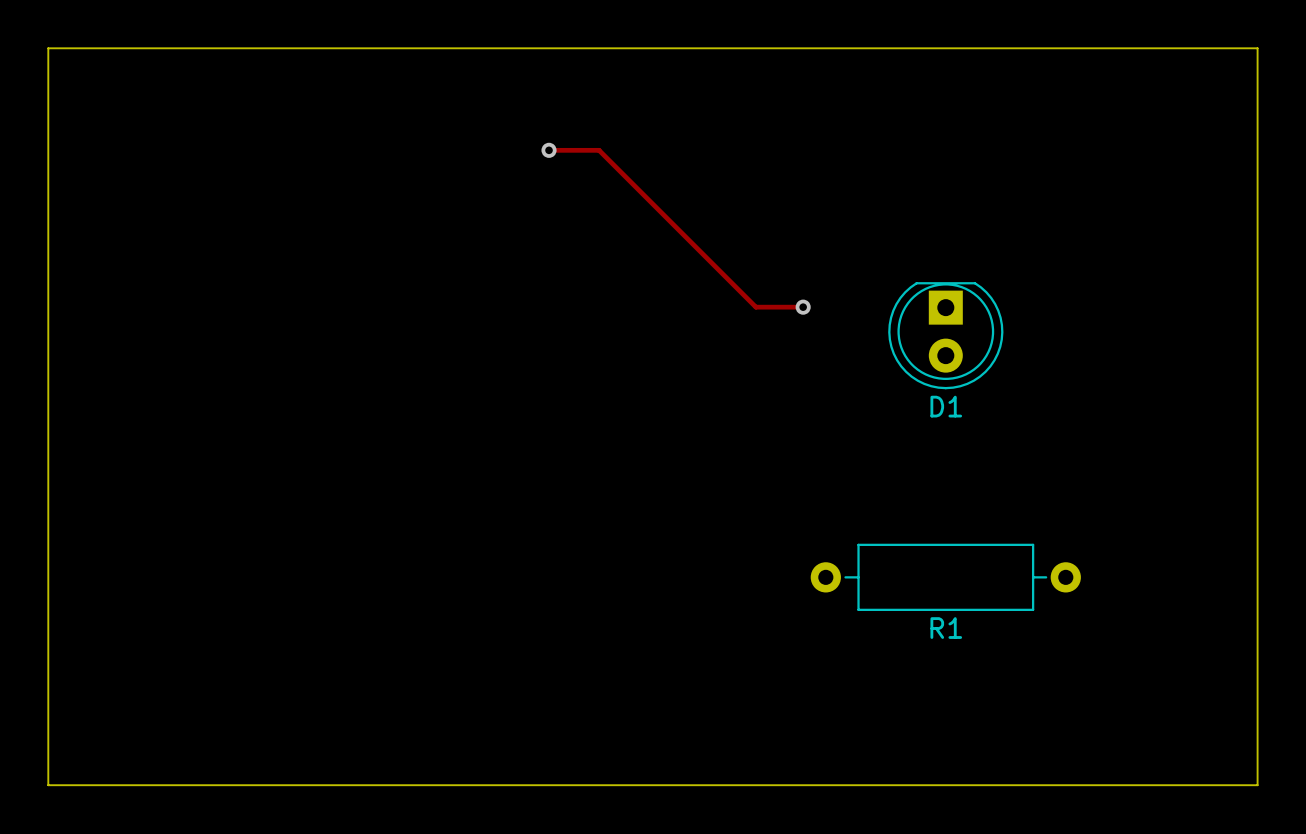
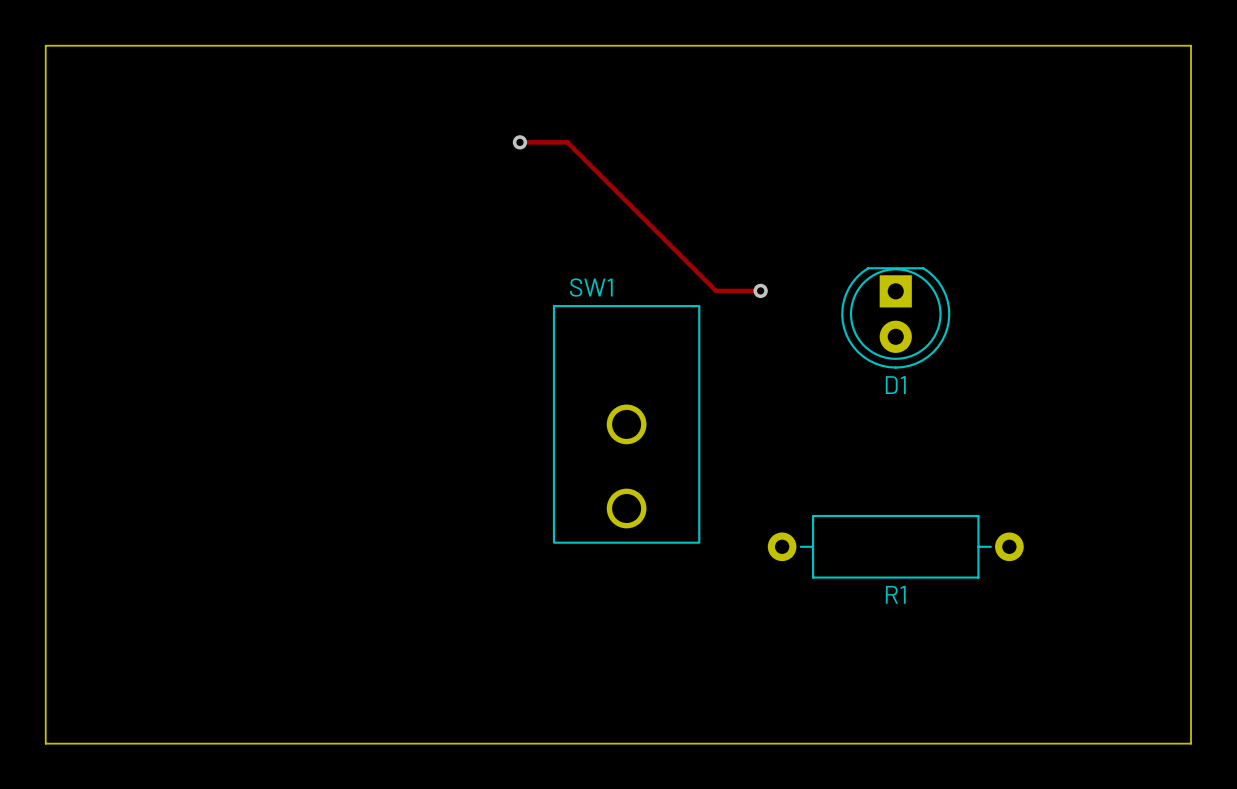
SW1: none -> (626, 424)

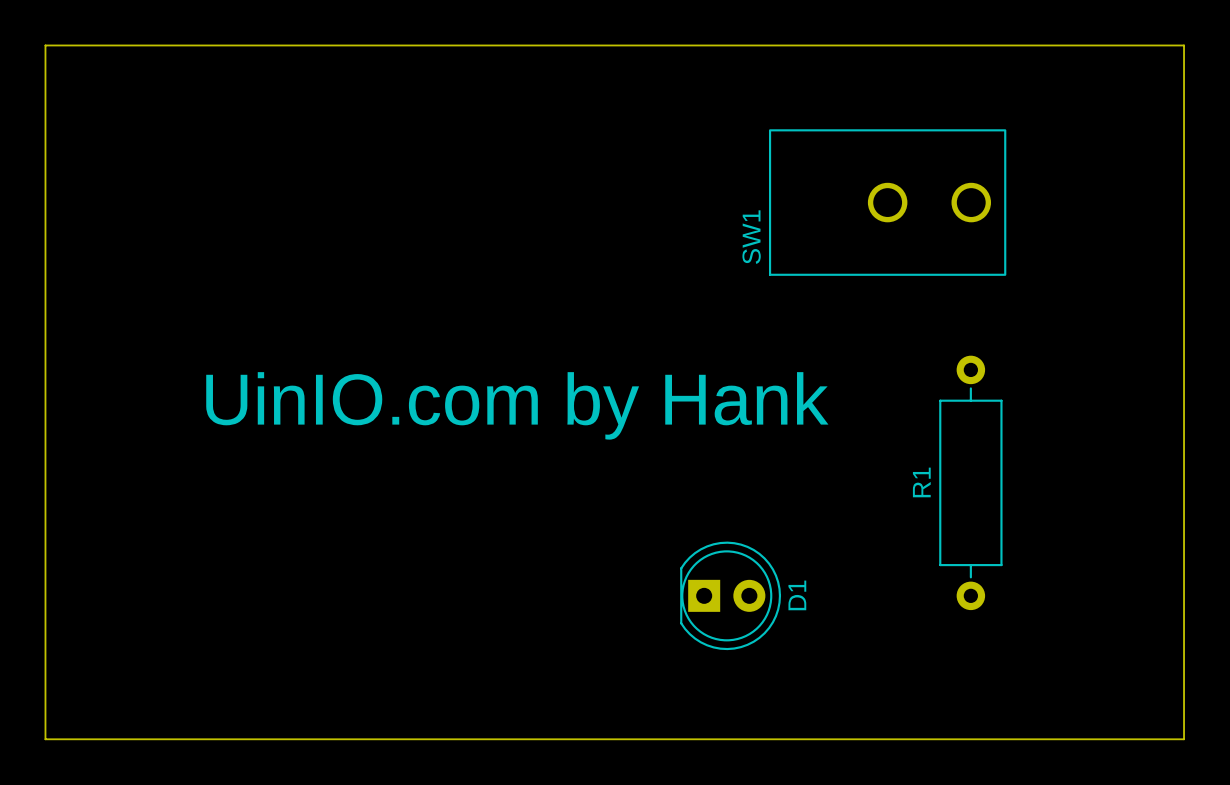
track: (519, 142) (567, 142) (715, 290) (760, 290) -> none
via: (519, 142) -> none
via: (760, 290) -> none
D1 rotation: 0° (895, 317) -> 90° counterclockwise (730, 595)
D1 position: (895, 317) -> (730, 595)
text: none -> UinIO.com by Hank (517, 405)
SW1 rotation: 0° (626, 424) -> 90° counterclockwise (887, 202)
SW1 position: (626, 424) -> (887, 202)
R1 rotation: 0° (895, 546) -> 90° clockwise (970, 482)

